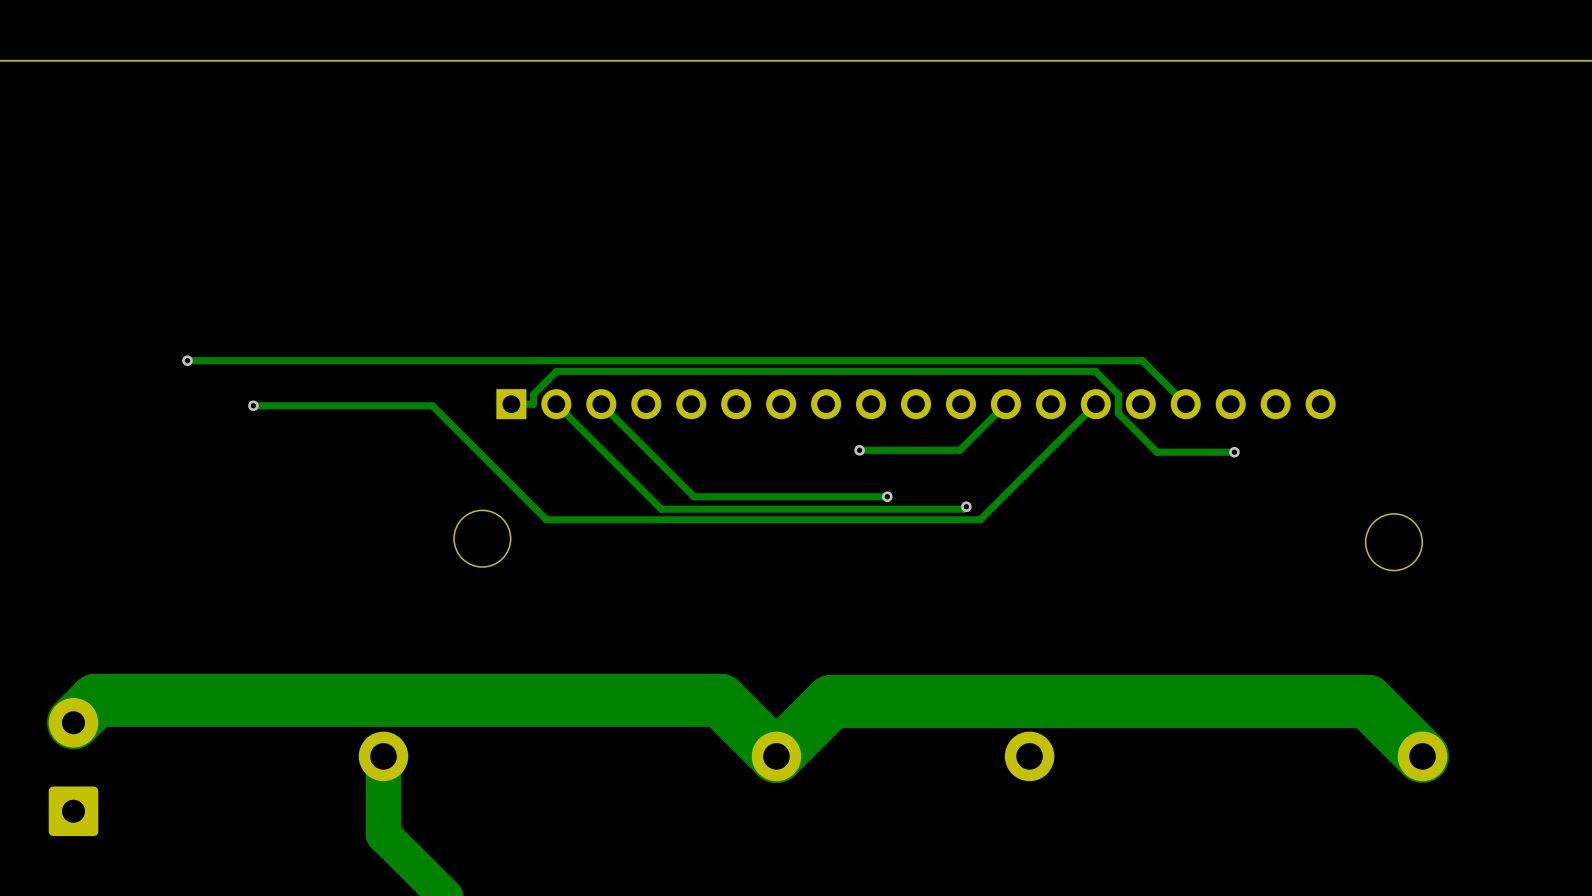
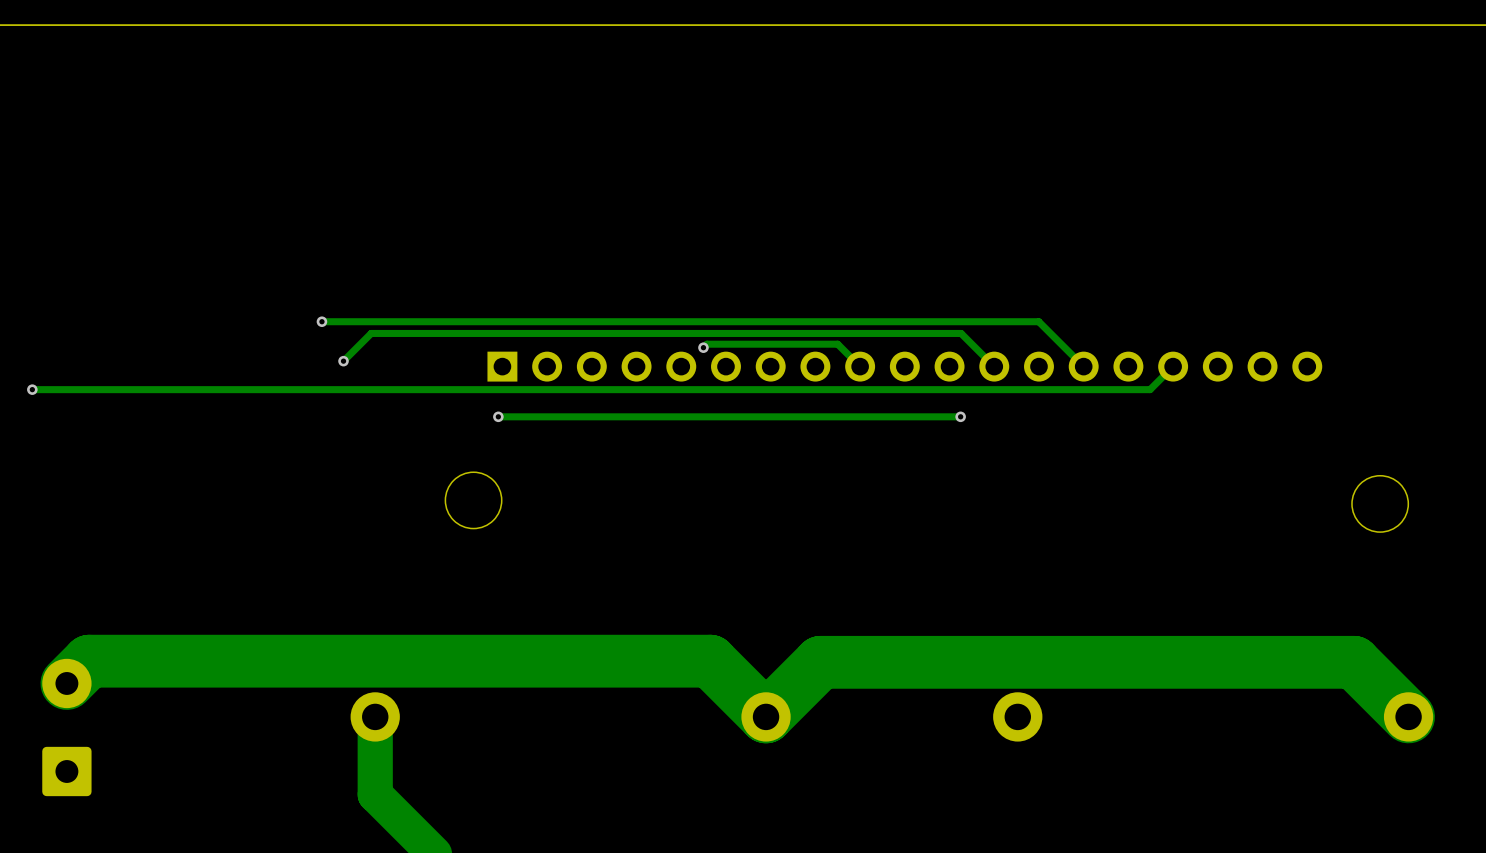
via: none -> (321, 321)
track: (187, 360) (1142, 360) (1185, 404) -> (32, 389) (1150, 389) (1173, 366)
via: (187, 360) -> none
track: none -> (703, 347) (706, 344) (837, 344) (860, 366)
via: none -> (703, 347)
via: none -> (343, 361)
track: (511, 404) (533, 404) (533, 394) (556, 371) (1095, 371) (1118, 394) (1118, 413) (1157, 452) (1234, 452) -> none
track: (556, 404) (661, 509) (963, 509) (966, 506) -> none
track: (601, 404) (693, 496) (887, 496) -> none
track: (1005, 404) (959, 450) (859, 450) -> (994, 366) (961, 333) (371, 333) (343, 361)
track: (1095, 404) (980, 519) (546, 519) (432, 405) (253, 405) -> (1083, 366) (1038, 321) (321, 321)
via: (253, 405) -> none
via: none -> (32, 389)
via: (859, 450) -> none
via: (1234, 452) -> none
via: none -> (498, 416)
track: none -> (960, 416) (498, 416)
via: none -> (960, 416)
via: (887, 496) -> none
via: (966, 506) -> none

